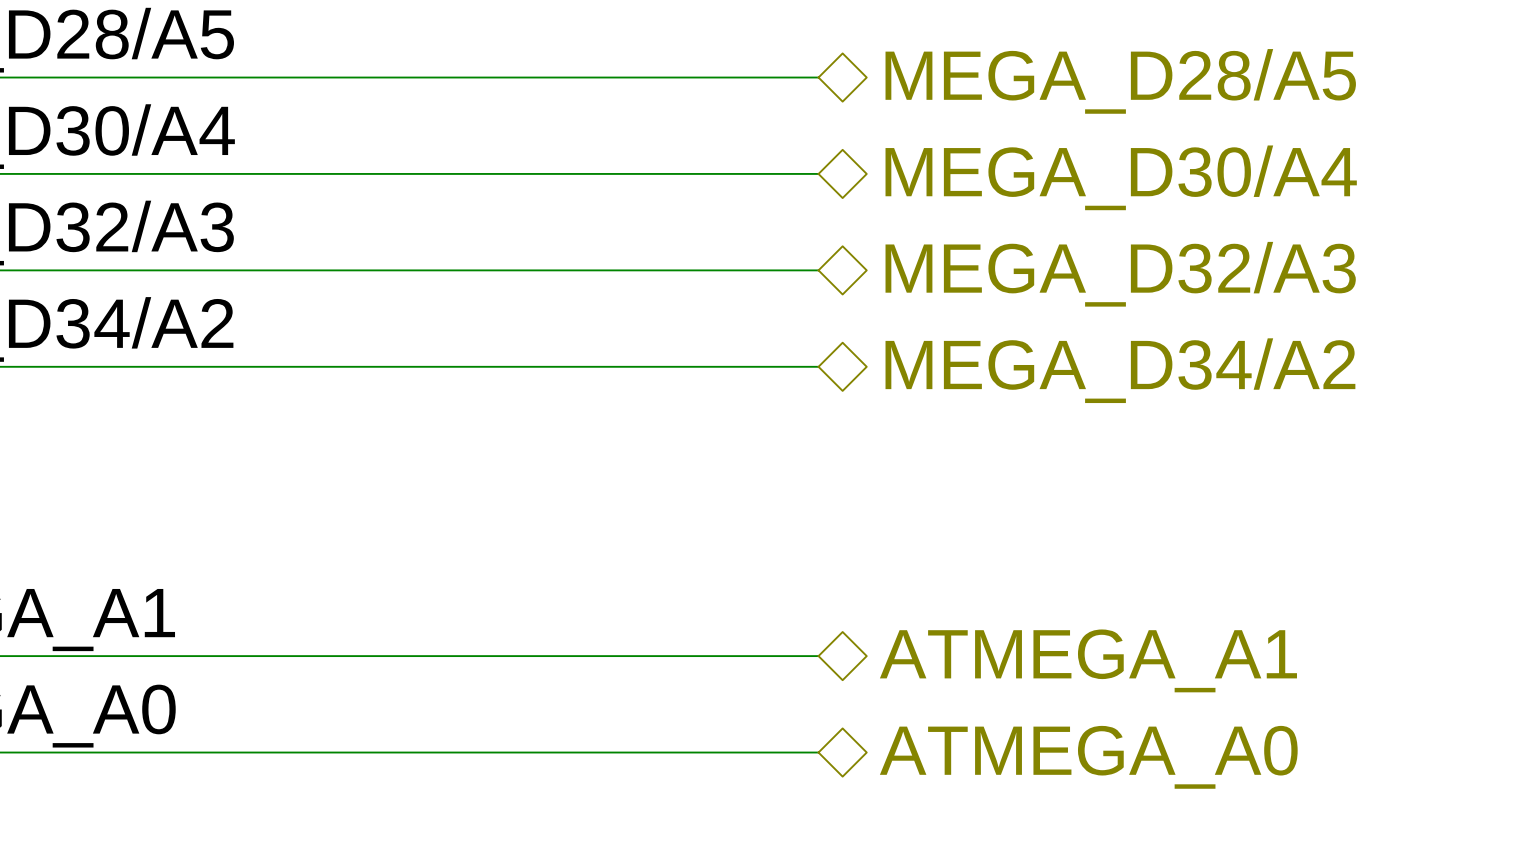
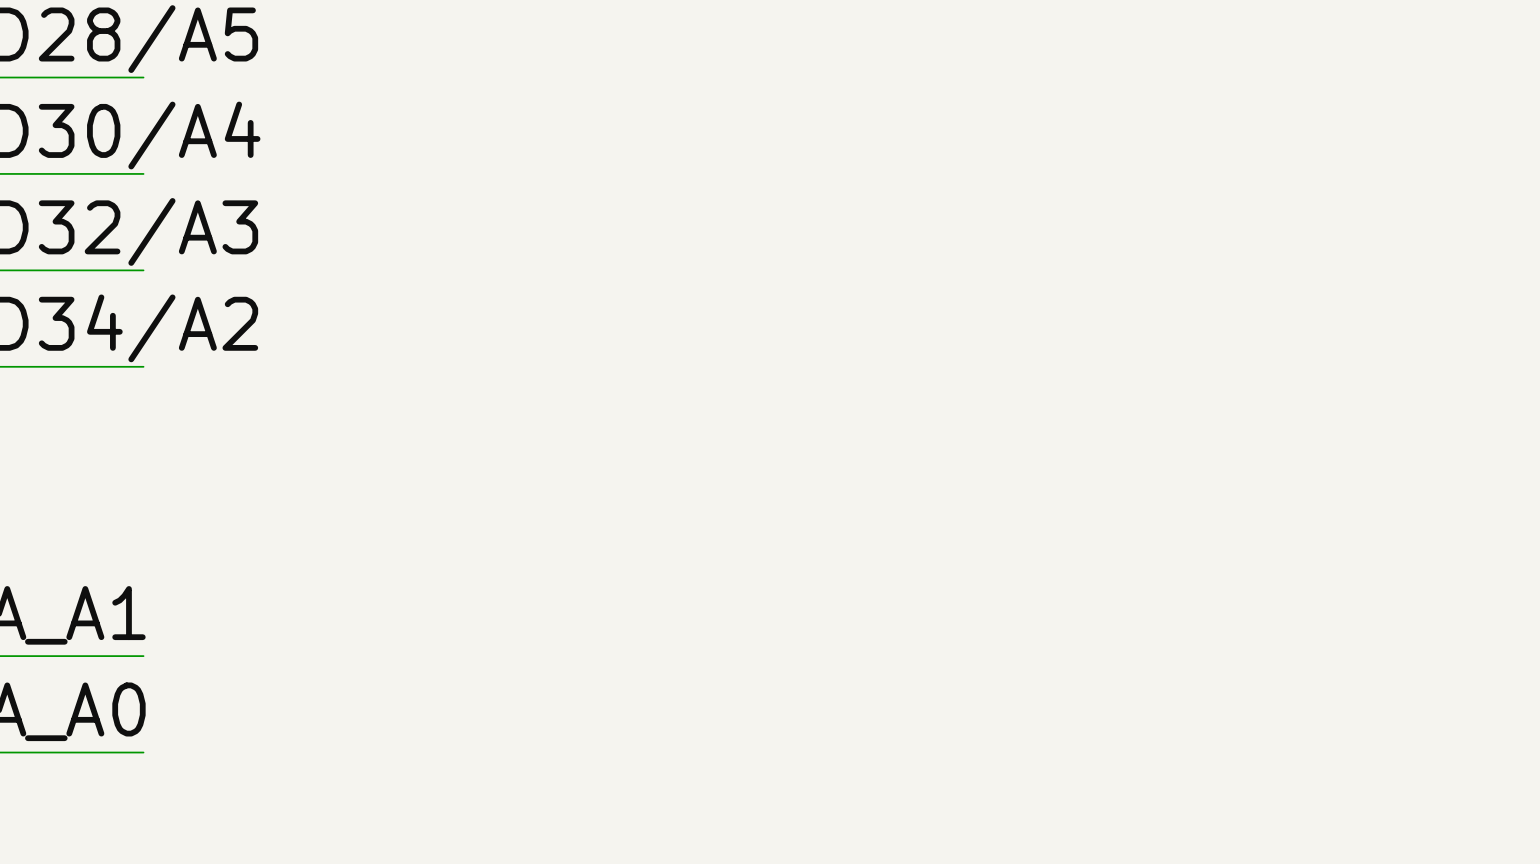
wire: (143, 77) (818, 77) -> none
hierarchical label: MEGA_D28/A5 (1120, 81) -> none
wire: (143, 173) (818, 173) -> none
hierarchical label: MEGA_D30/A4 (1121, 177) -> none
wire: (143, 270) (818, 270) -> none
hierarchical label: MEGA_D32/A3 (1120, 274) -> none
wire: (143, 366) (818, 366) -> none
hierarchical label: MEGA_D34/A2 (1120, 370) -> none
wire: (143, 656) (818, 656) -> none
hierarchical label: ATMEGA_A1 (1088, 660) -> none
wire: (143, 752) (818, 752) -> none
hierarchical label: ATMEGA_A0 (1088, 757) -> none

